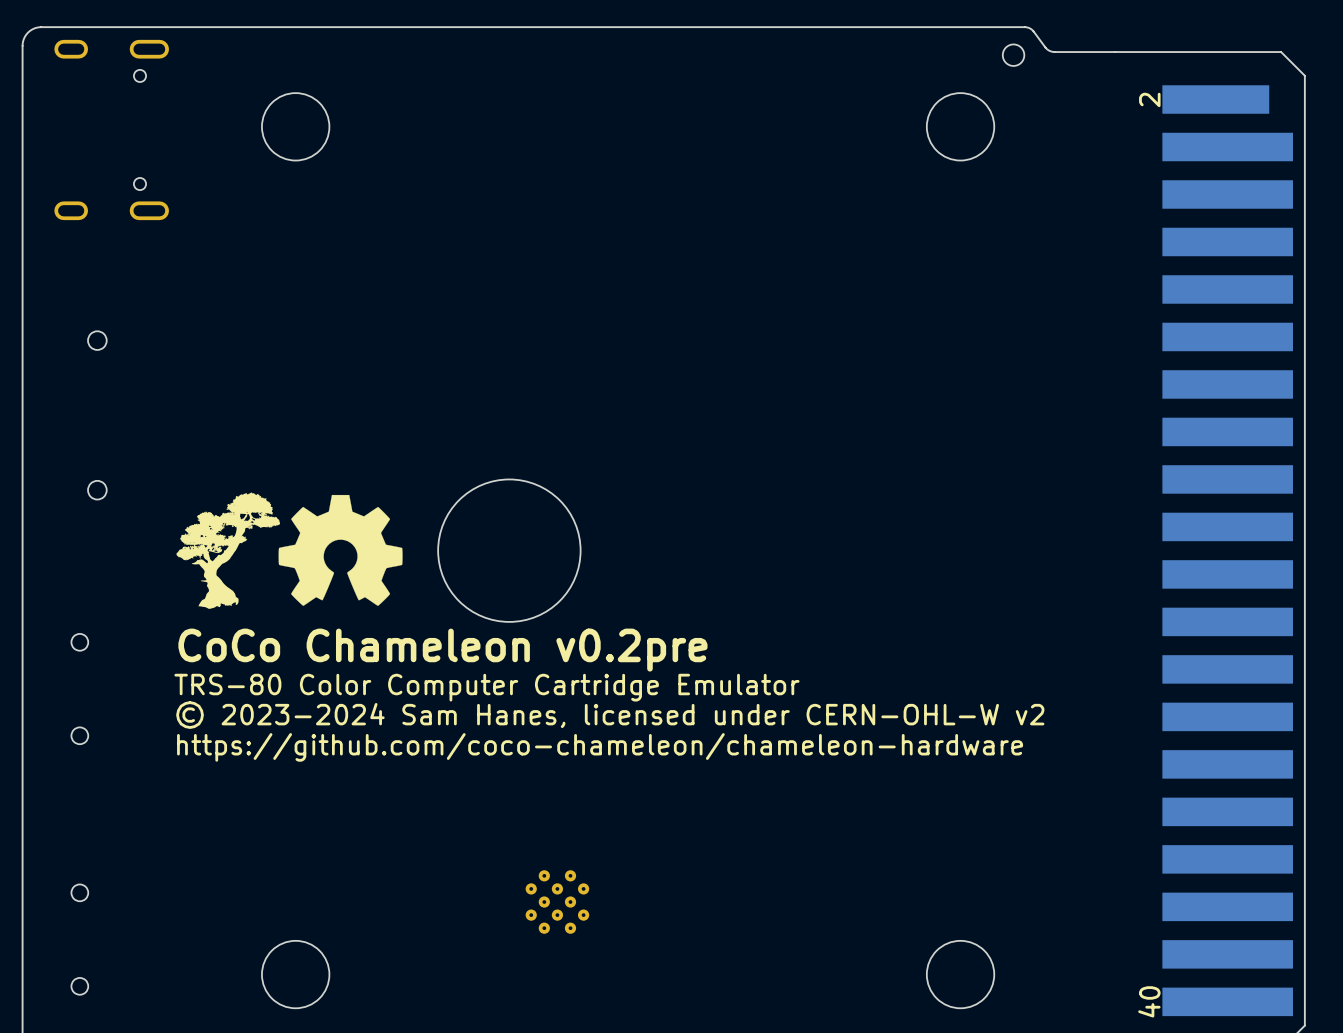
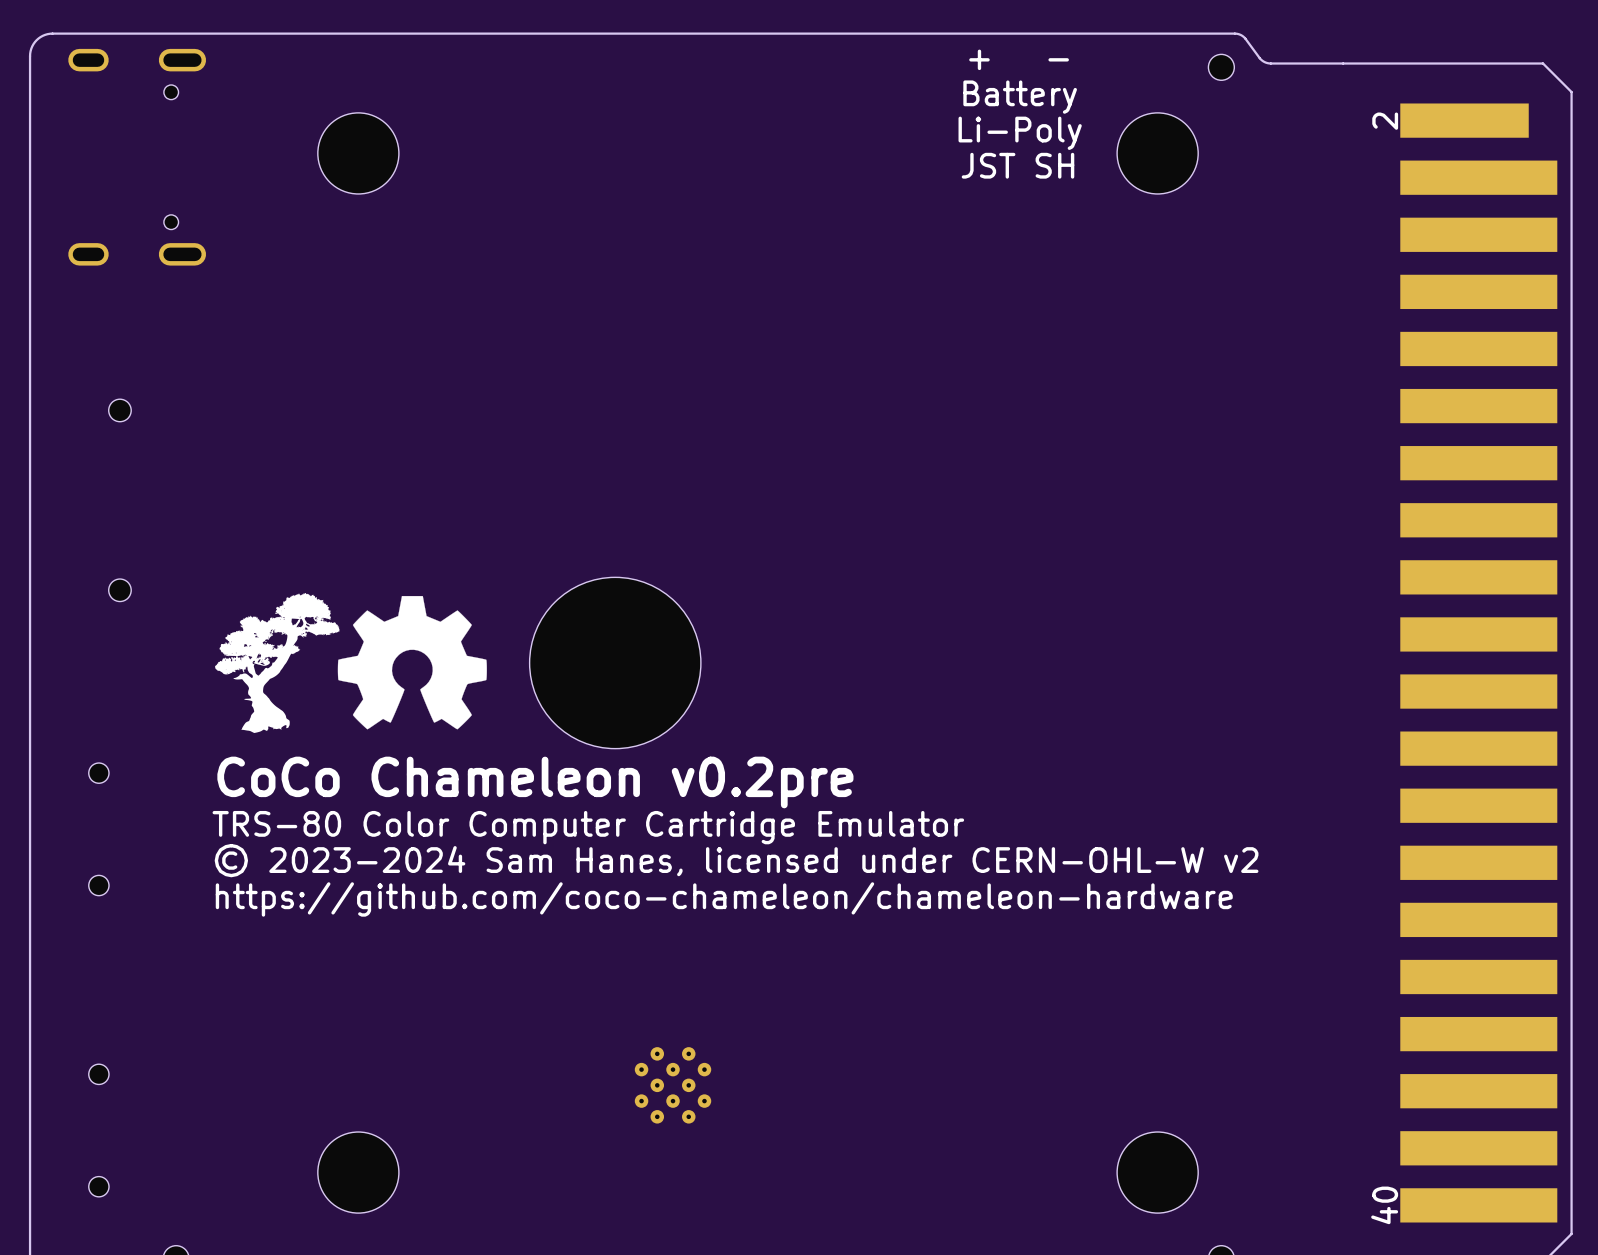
text: none -> + - (1019, 59)
text: none -> Battery (1020, 97)
text: none -> Li-Poly (1020, 133)
text: none -> JST SH (1018, 165)

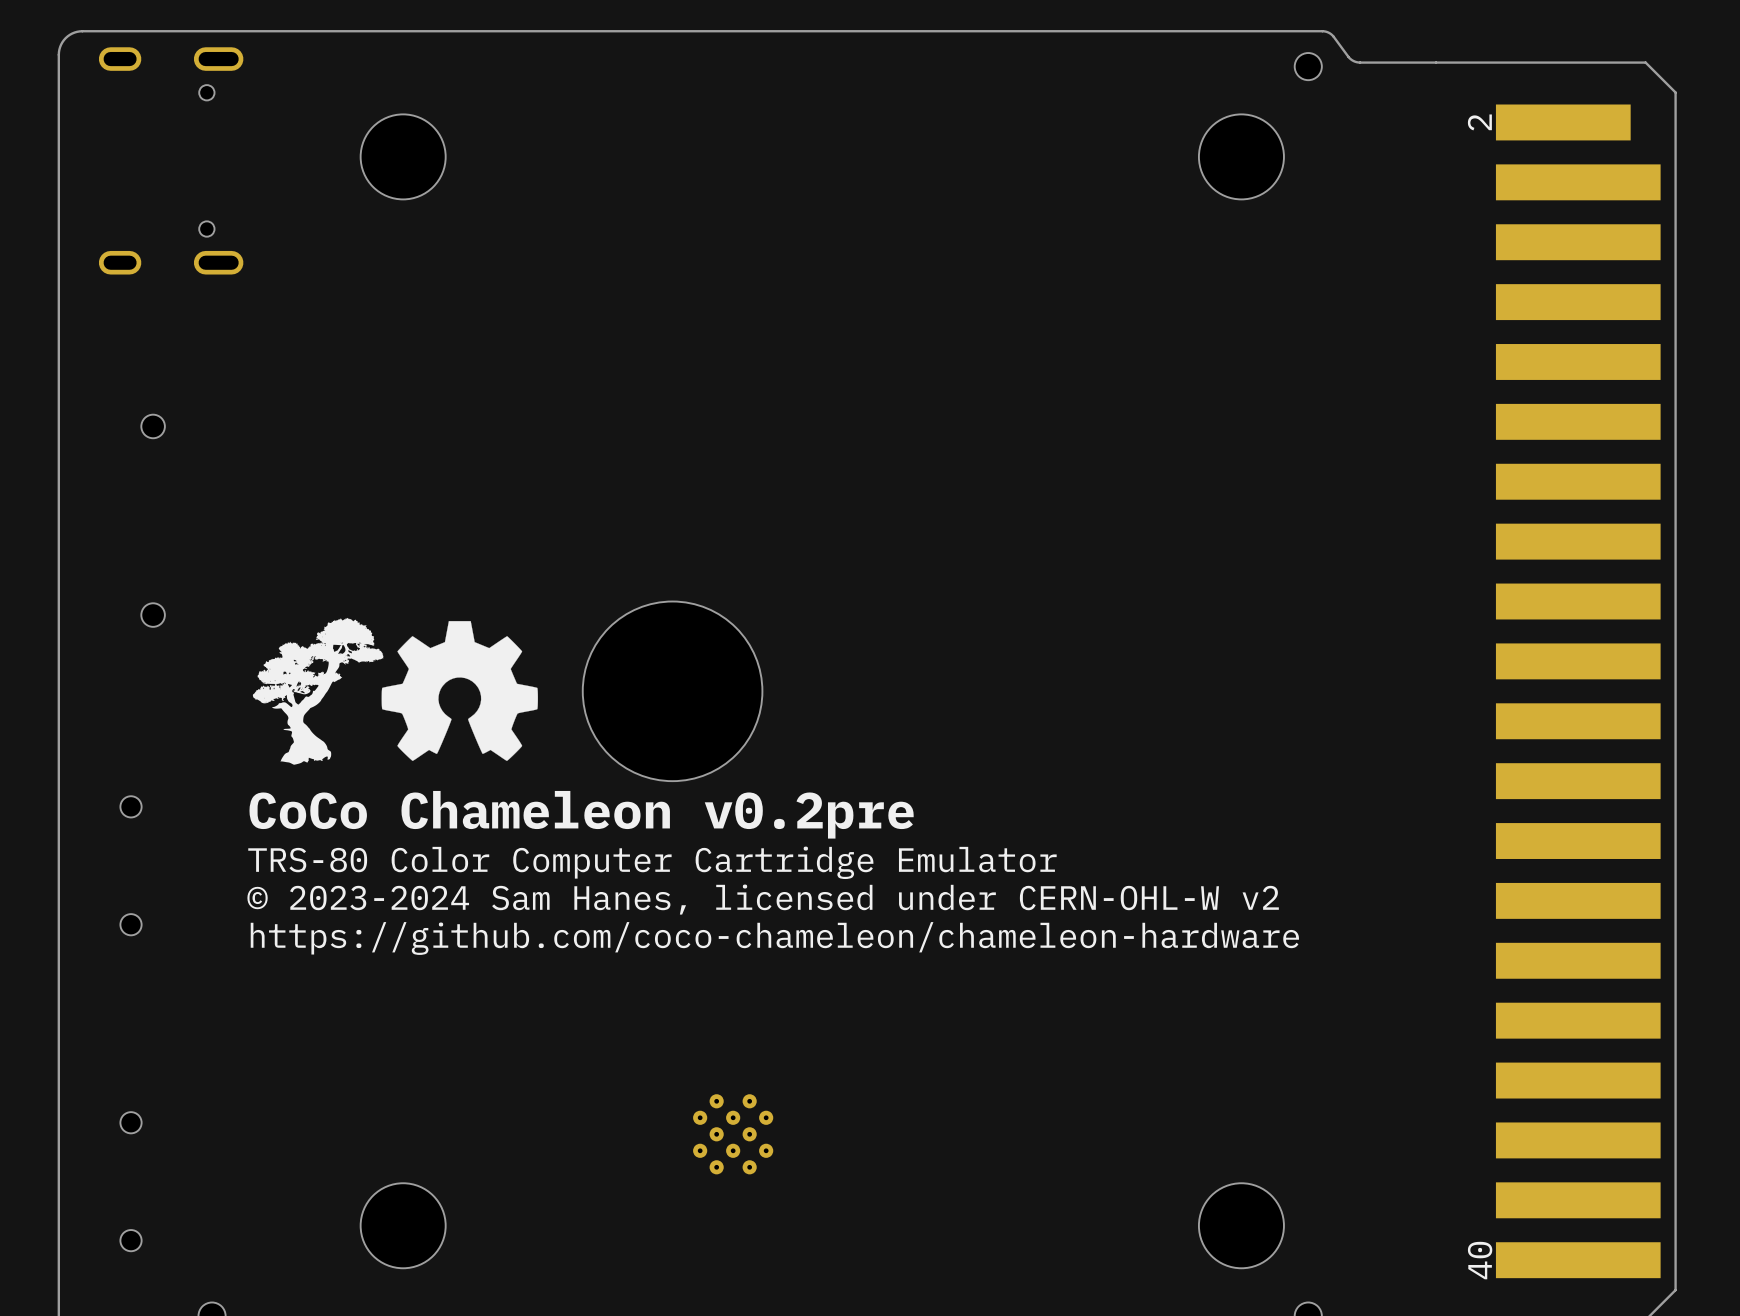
text: + - (1019, 59) -> none
text: Battery (1020, 97) -> none
text: Li-Poly (1020, 133) -> none
text: JST SH (1018, 165) -> none

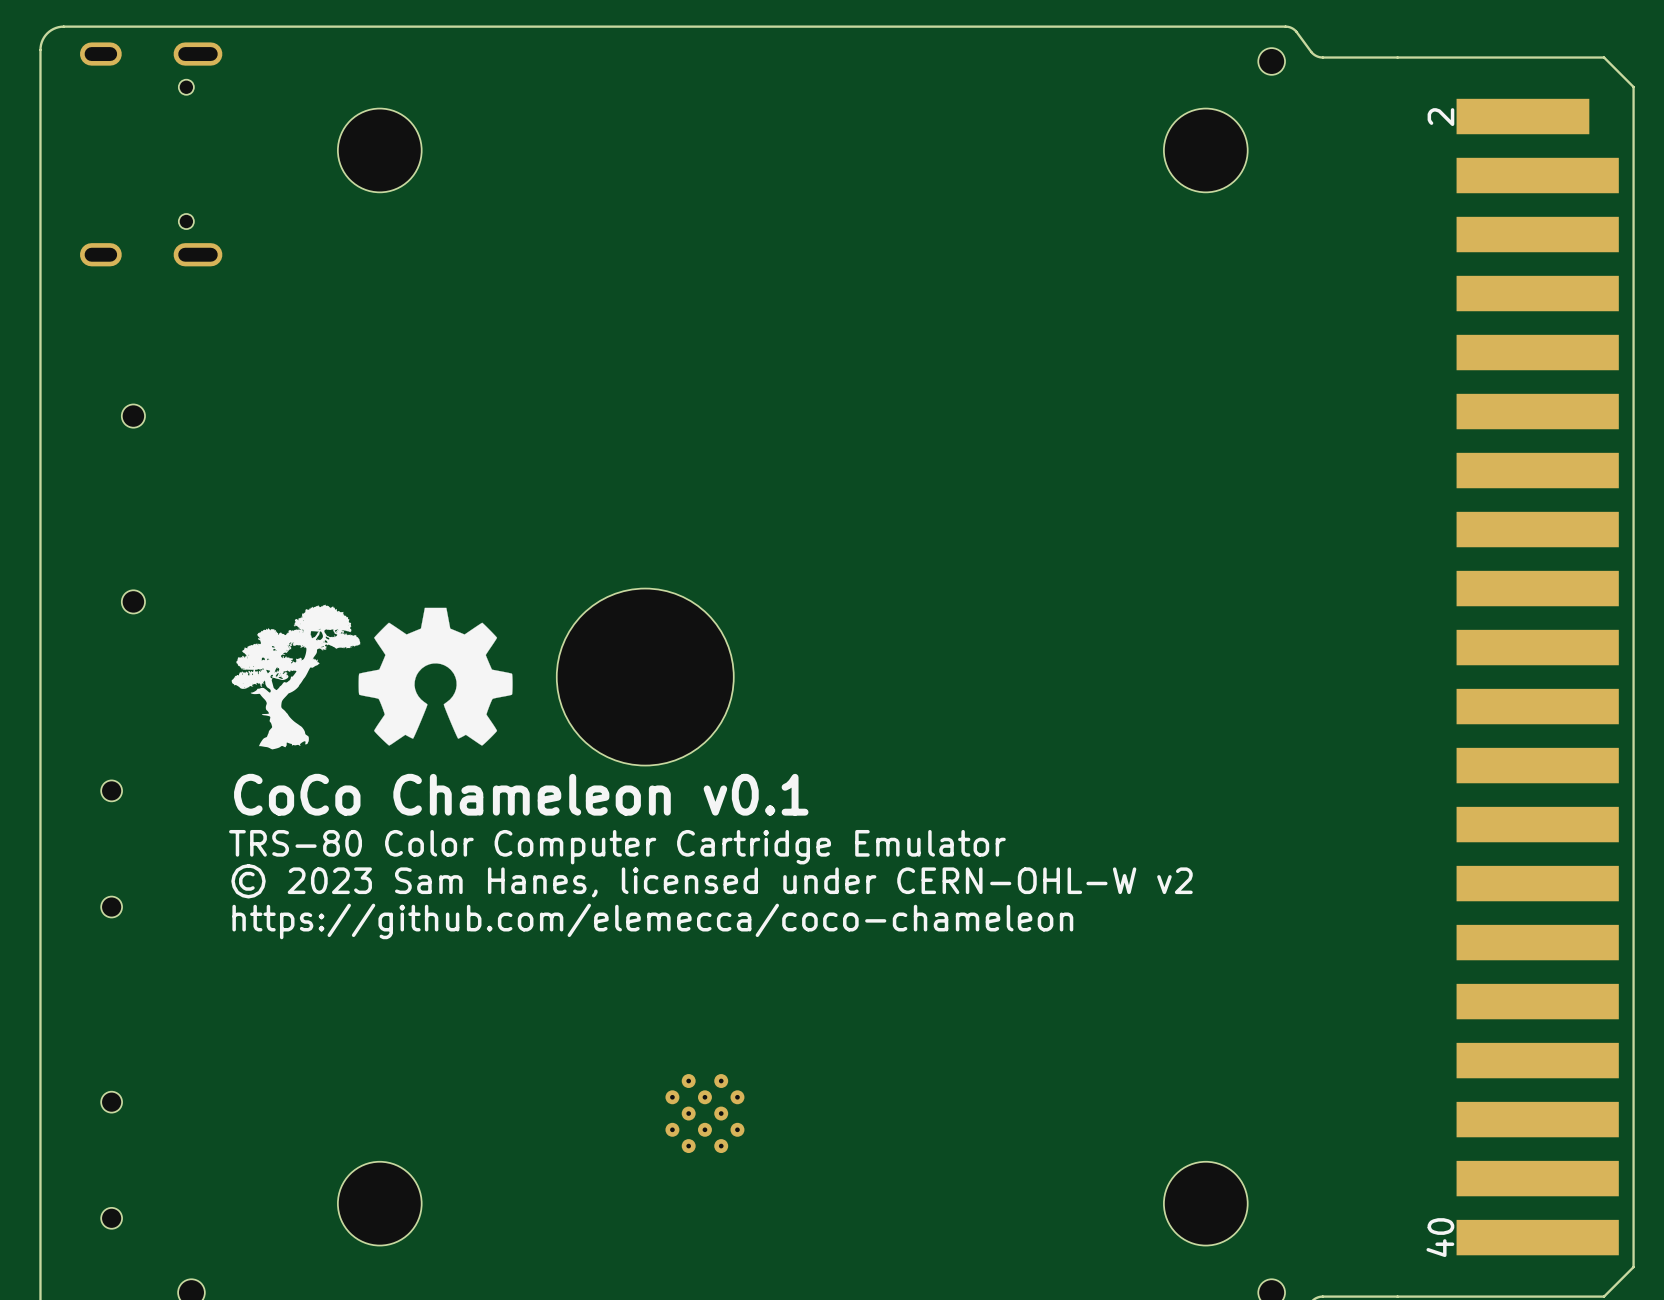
text: CoCo Chameleon v0.2pre (581, 814) -> CoCo Chameleon v0.1 (521, 794)
text: © 2023-2024 Sam Hanes, licensed under CERN-OHL-W v2 (763, 899) -> © 2023 Sam Hanes, licensed under CERN-OHL-W v2 (712, 881)
text: https://github.com/coco-chameleon/chameleon-hardware (774, 938) -> https://github.com/elemecca/coco-chameleon (652, 921)

